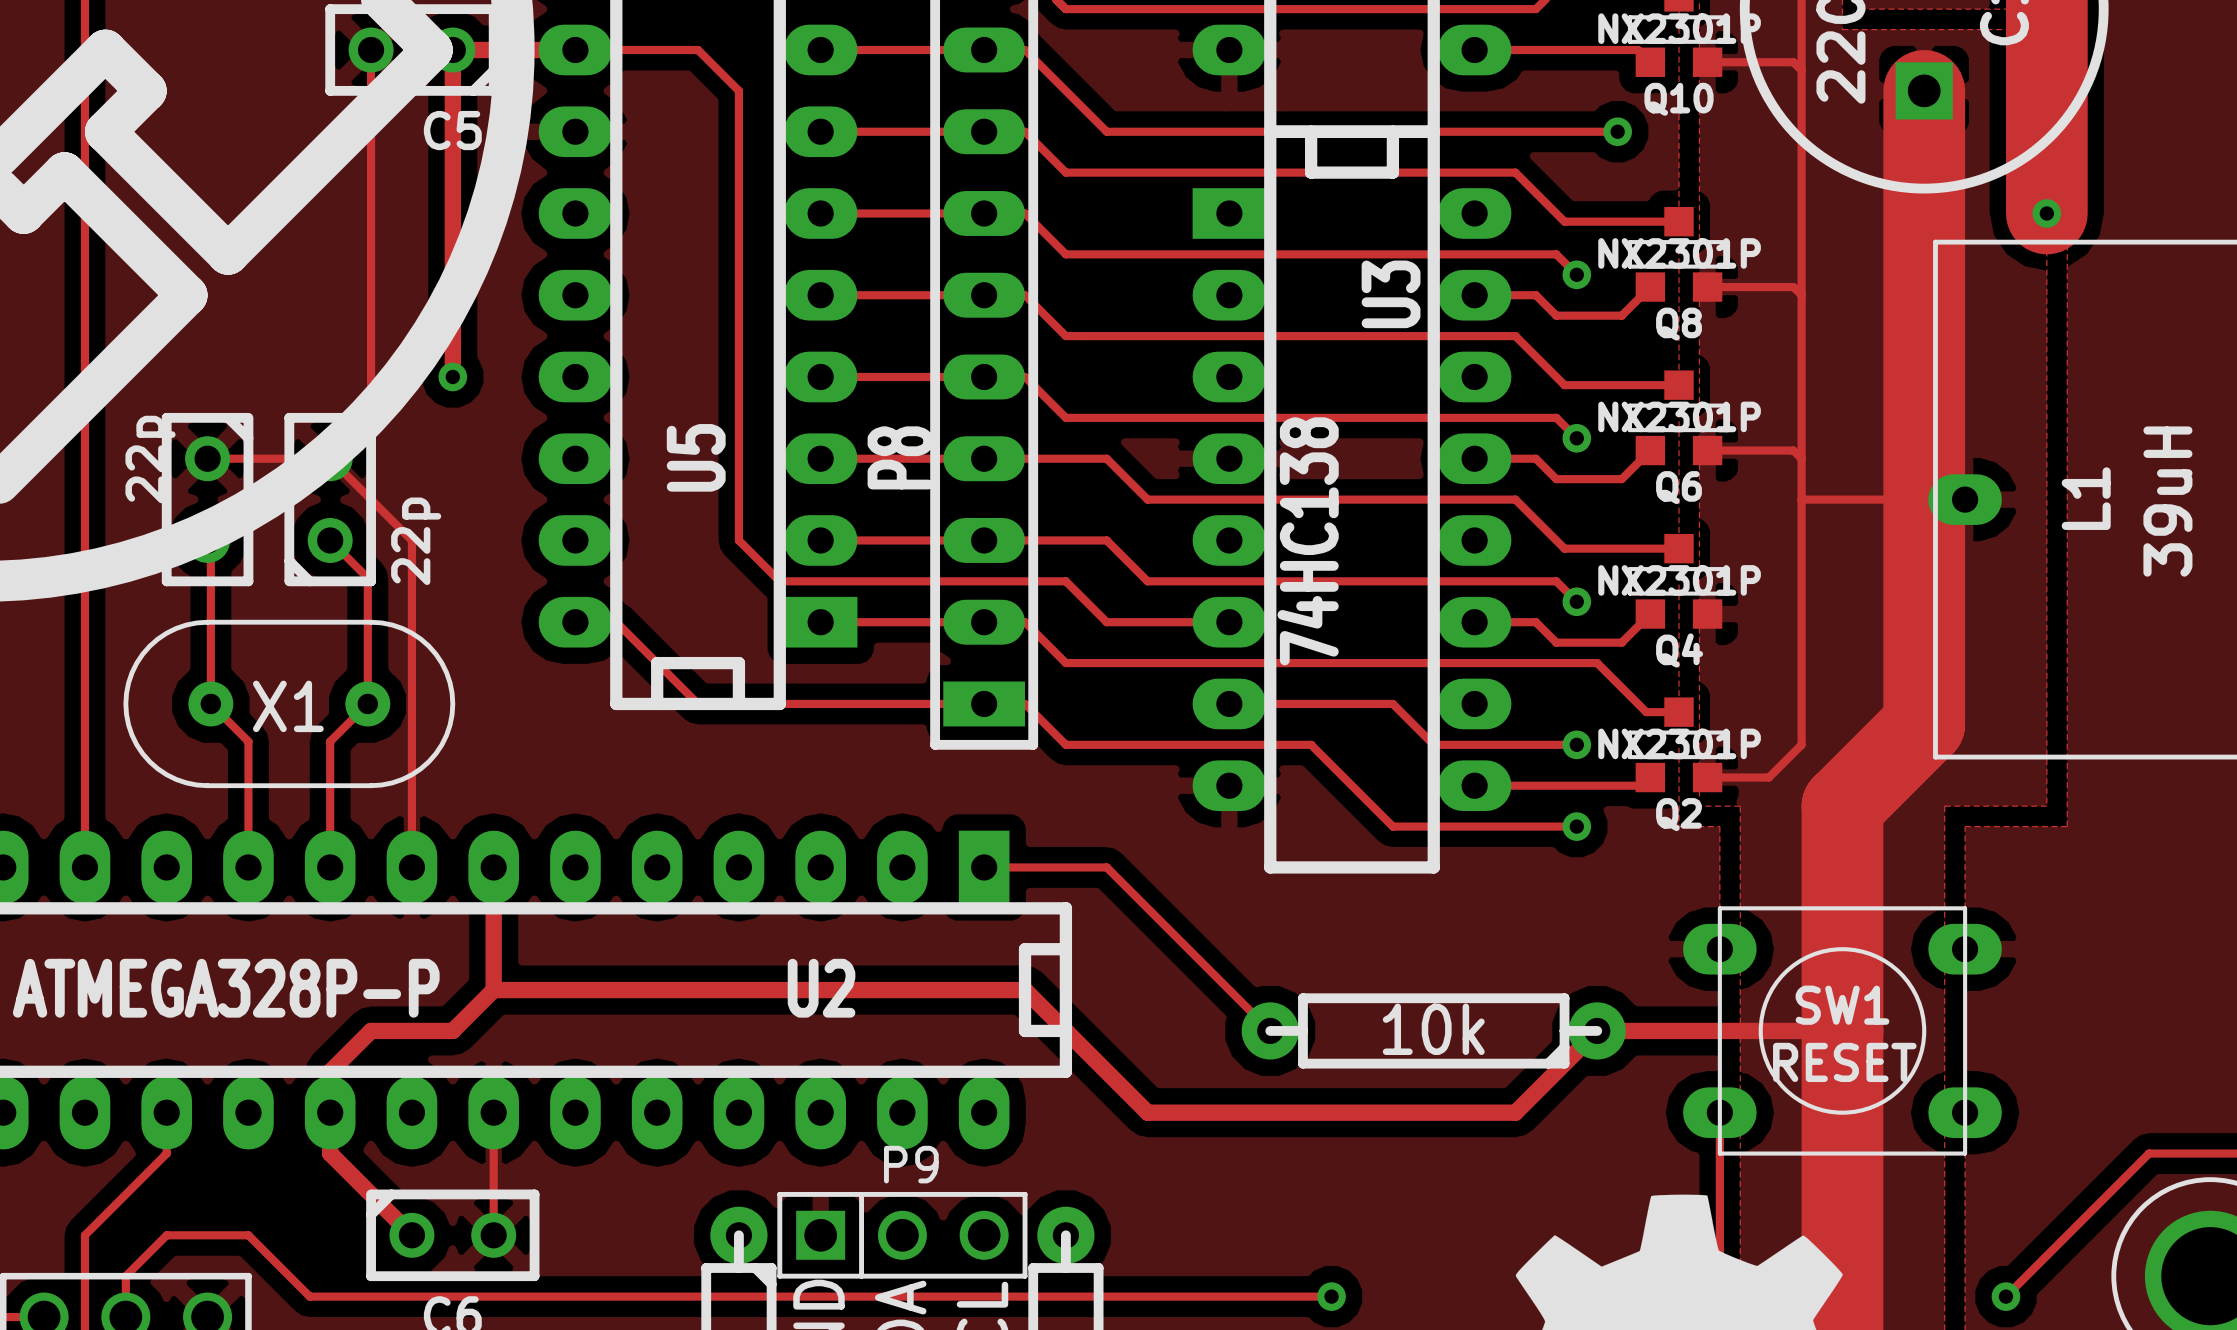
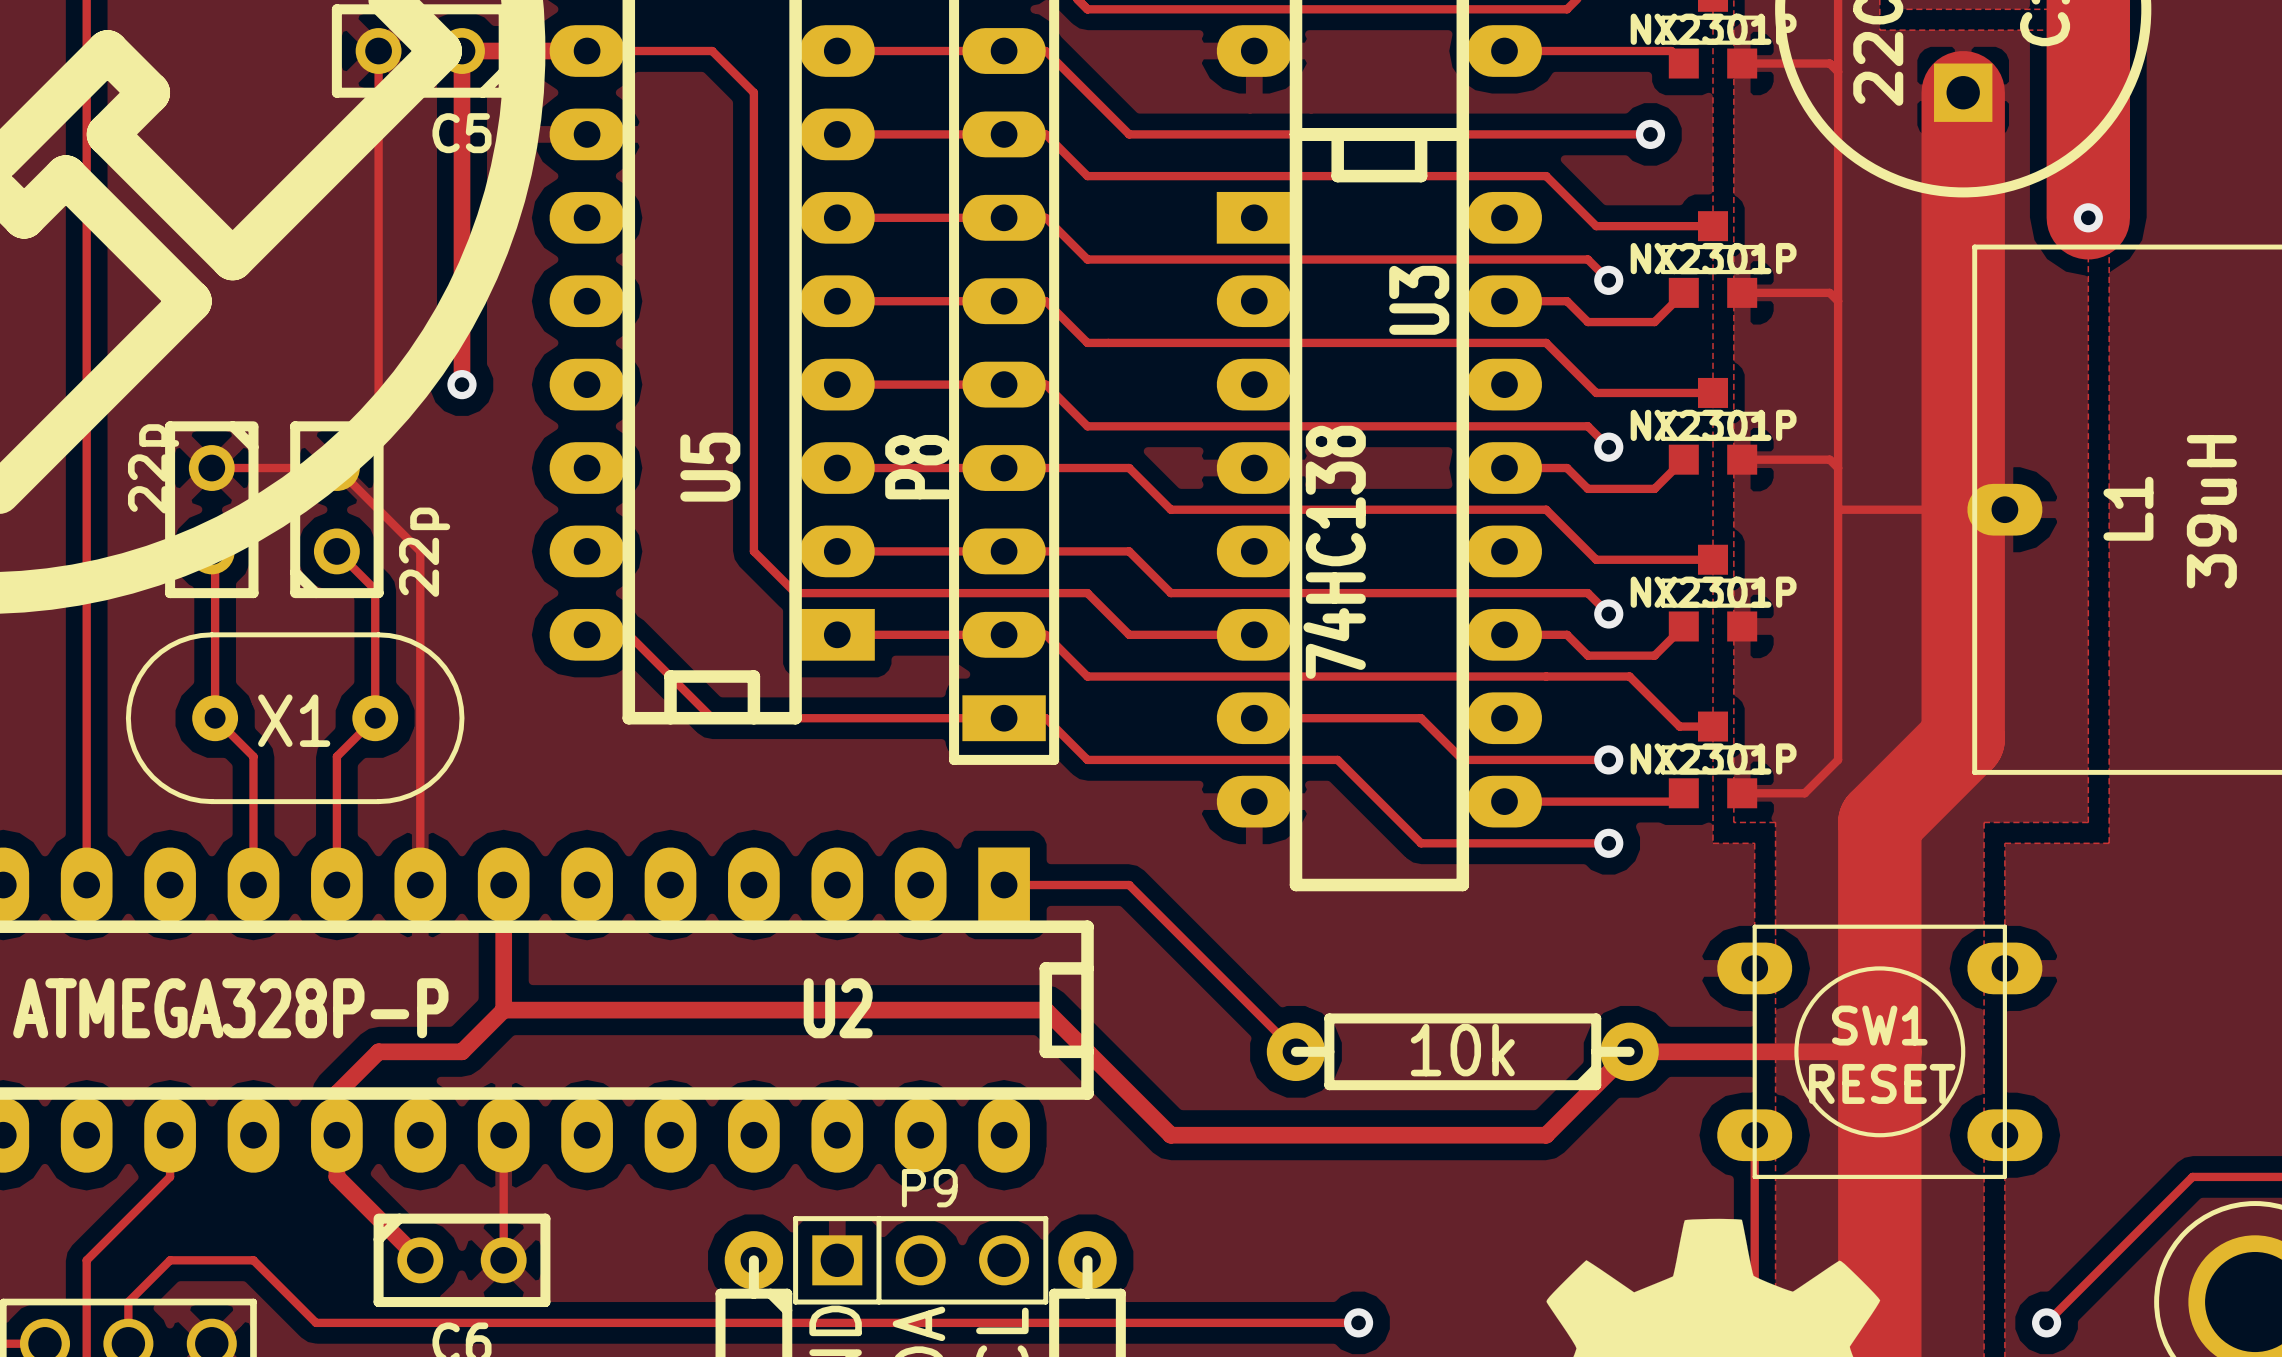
Q10 name: Q10 (1678, 99) -> none
Q8 name: Q8 (1678, 324) -> none
Q6 name: Q6 (1678, 487) -> none
Q4 name: Q4 (1679, 650) -> none
Q2 name: Q2 (1678, 814) -> none

